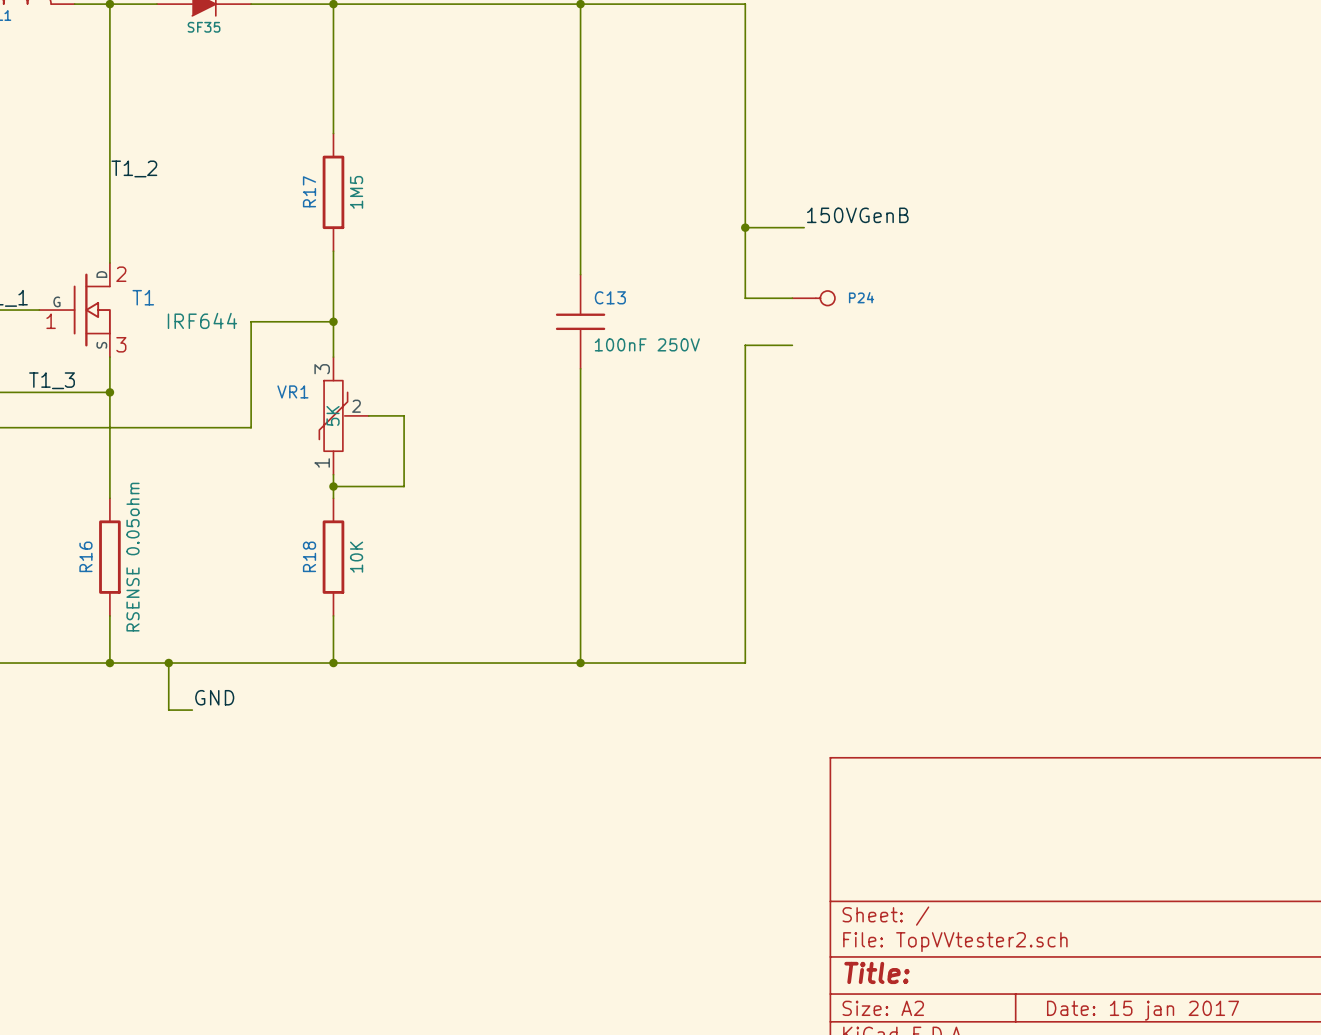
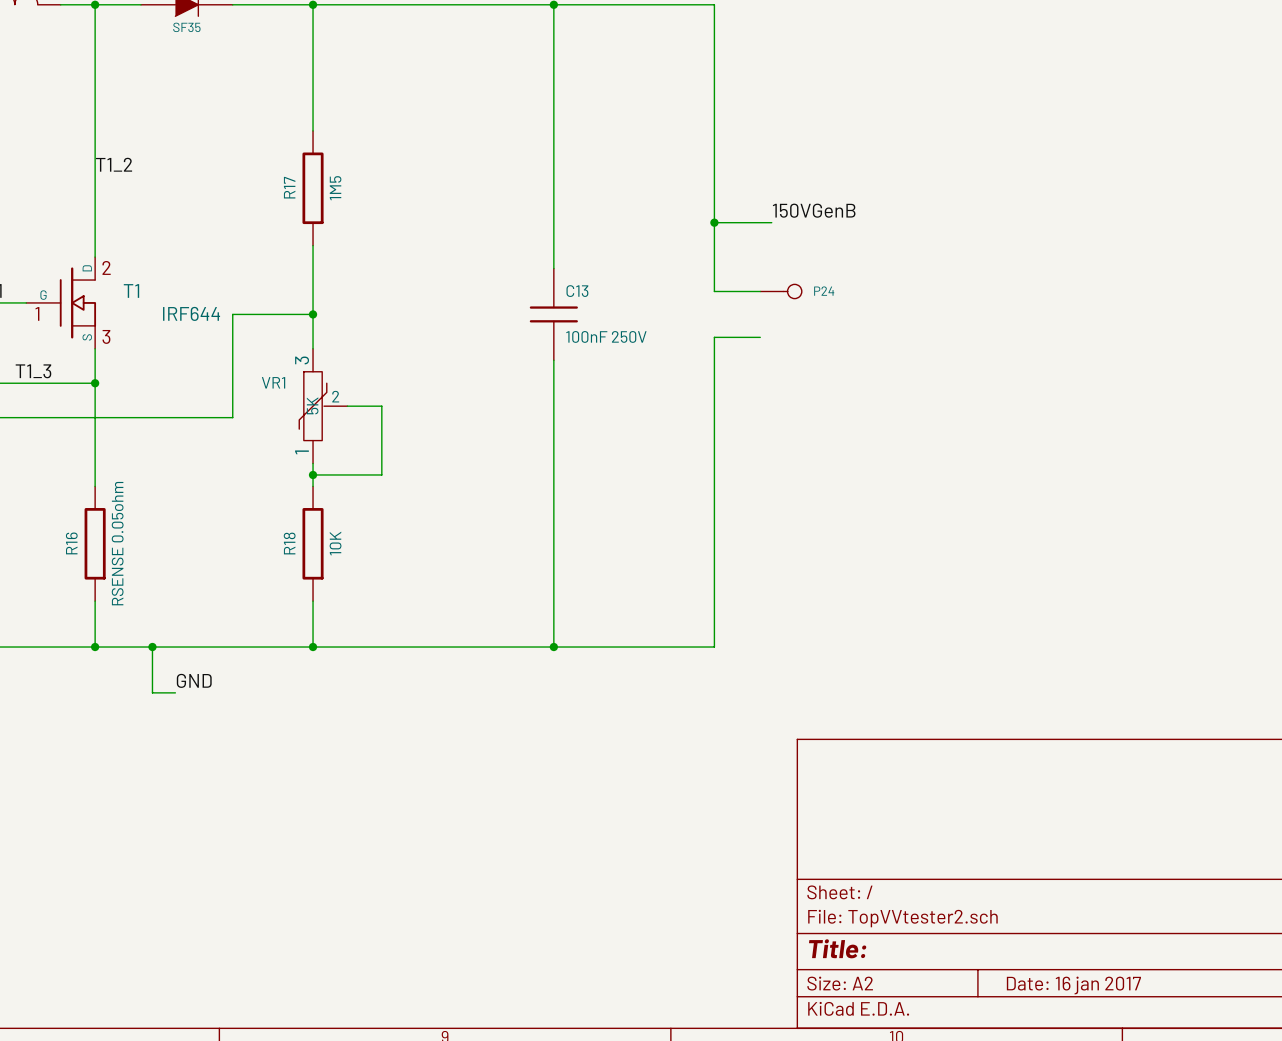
title block: Date: 15 jan 2017 (1143, 1010) -> Date: 16 jan 2017 (1073, 985)

